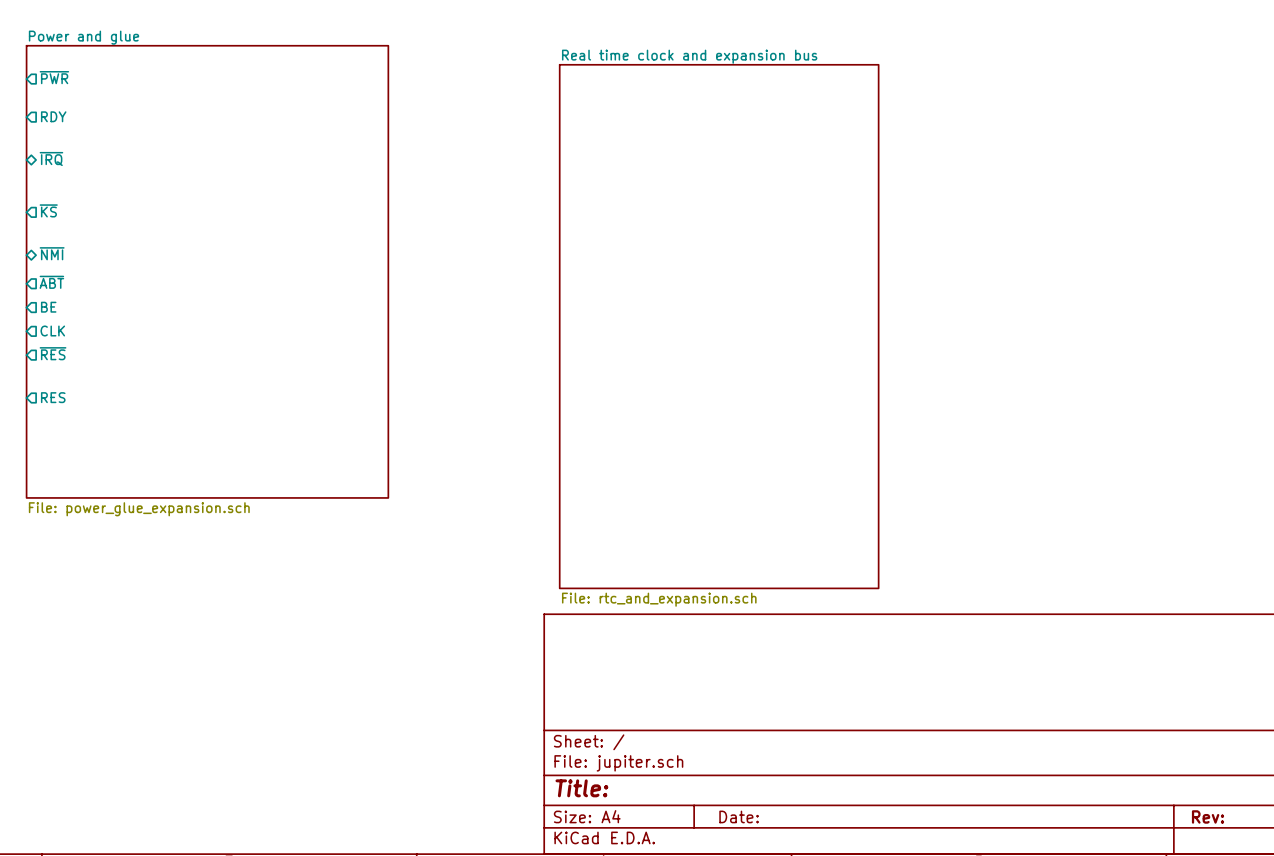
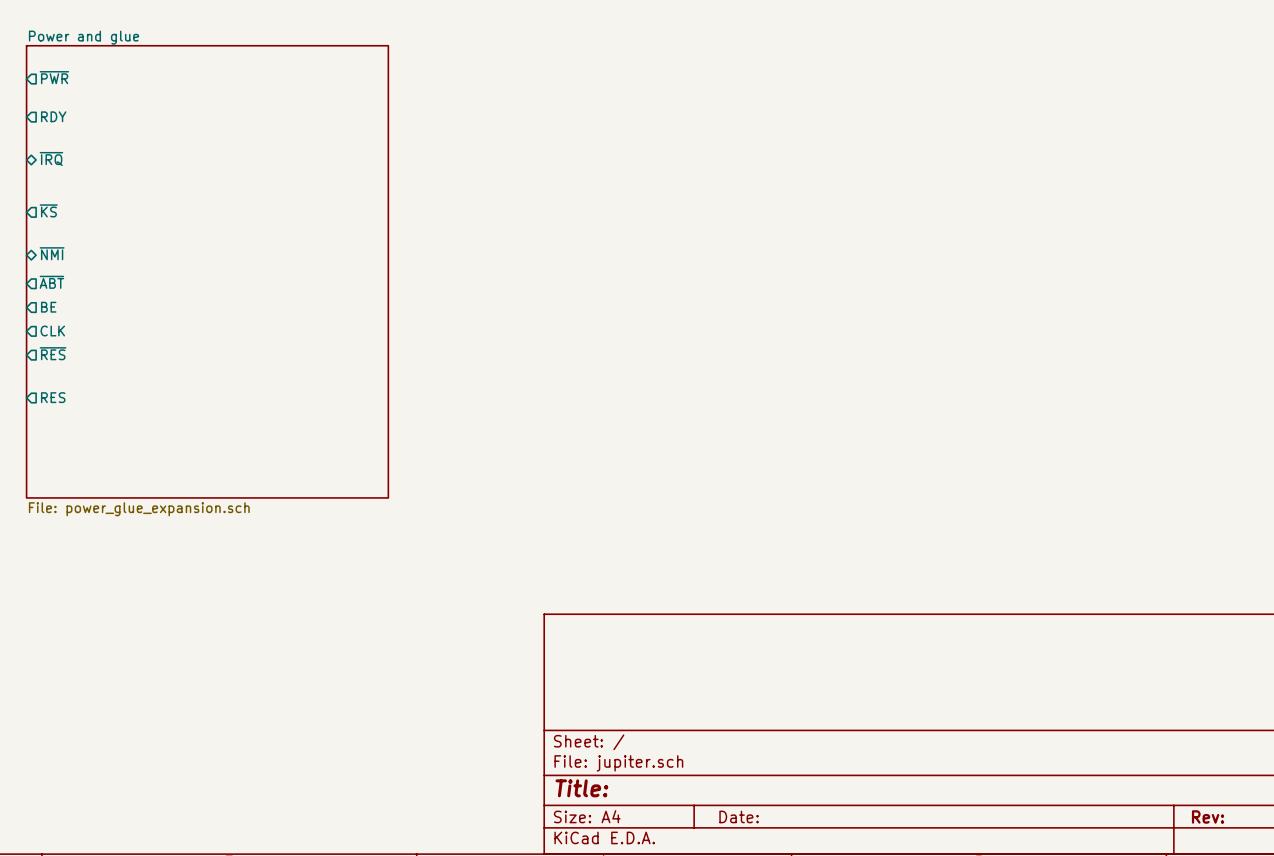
sheet Real time clock and expansion bus: File: rtc_and_expansion.sch (719, 326) -> none

